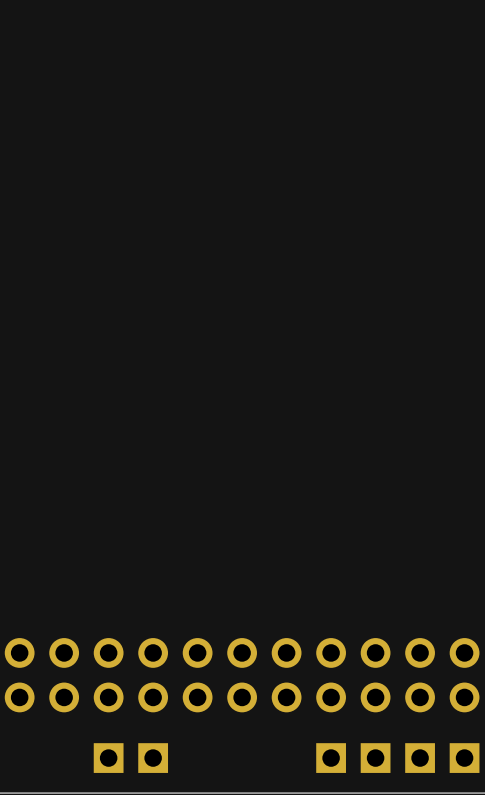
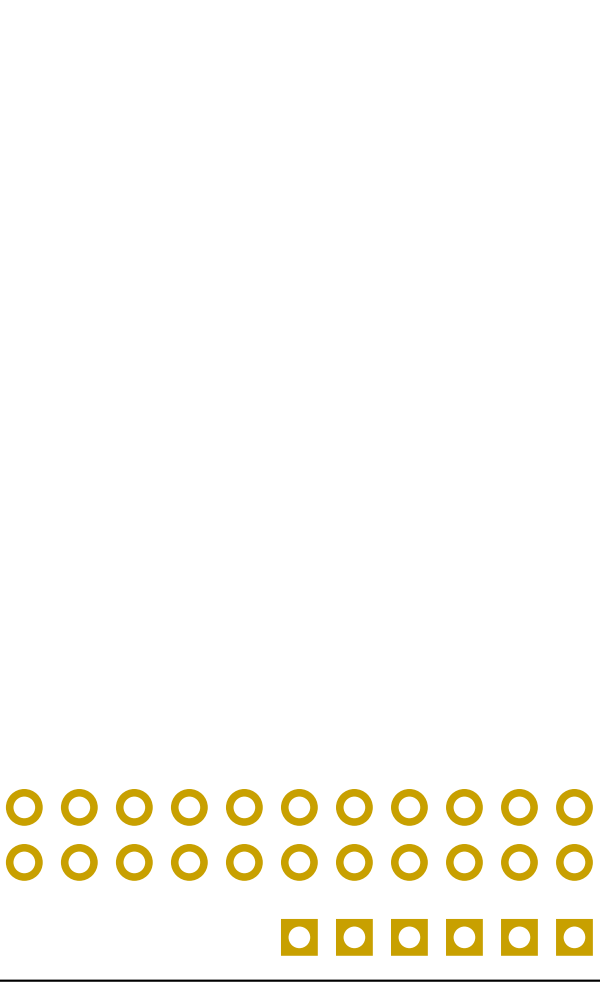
part: (108, 758) -> none
part: (153, 758) -> none
part: none -> (299, 937)
part: none -> (354, 937)

